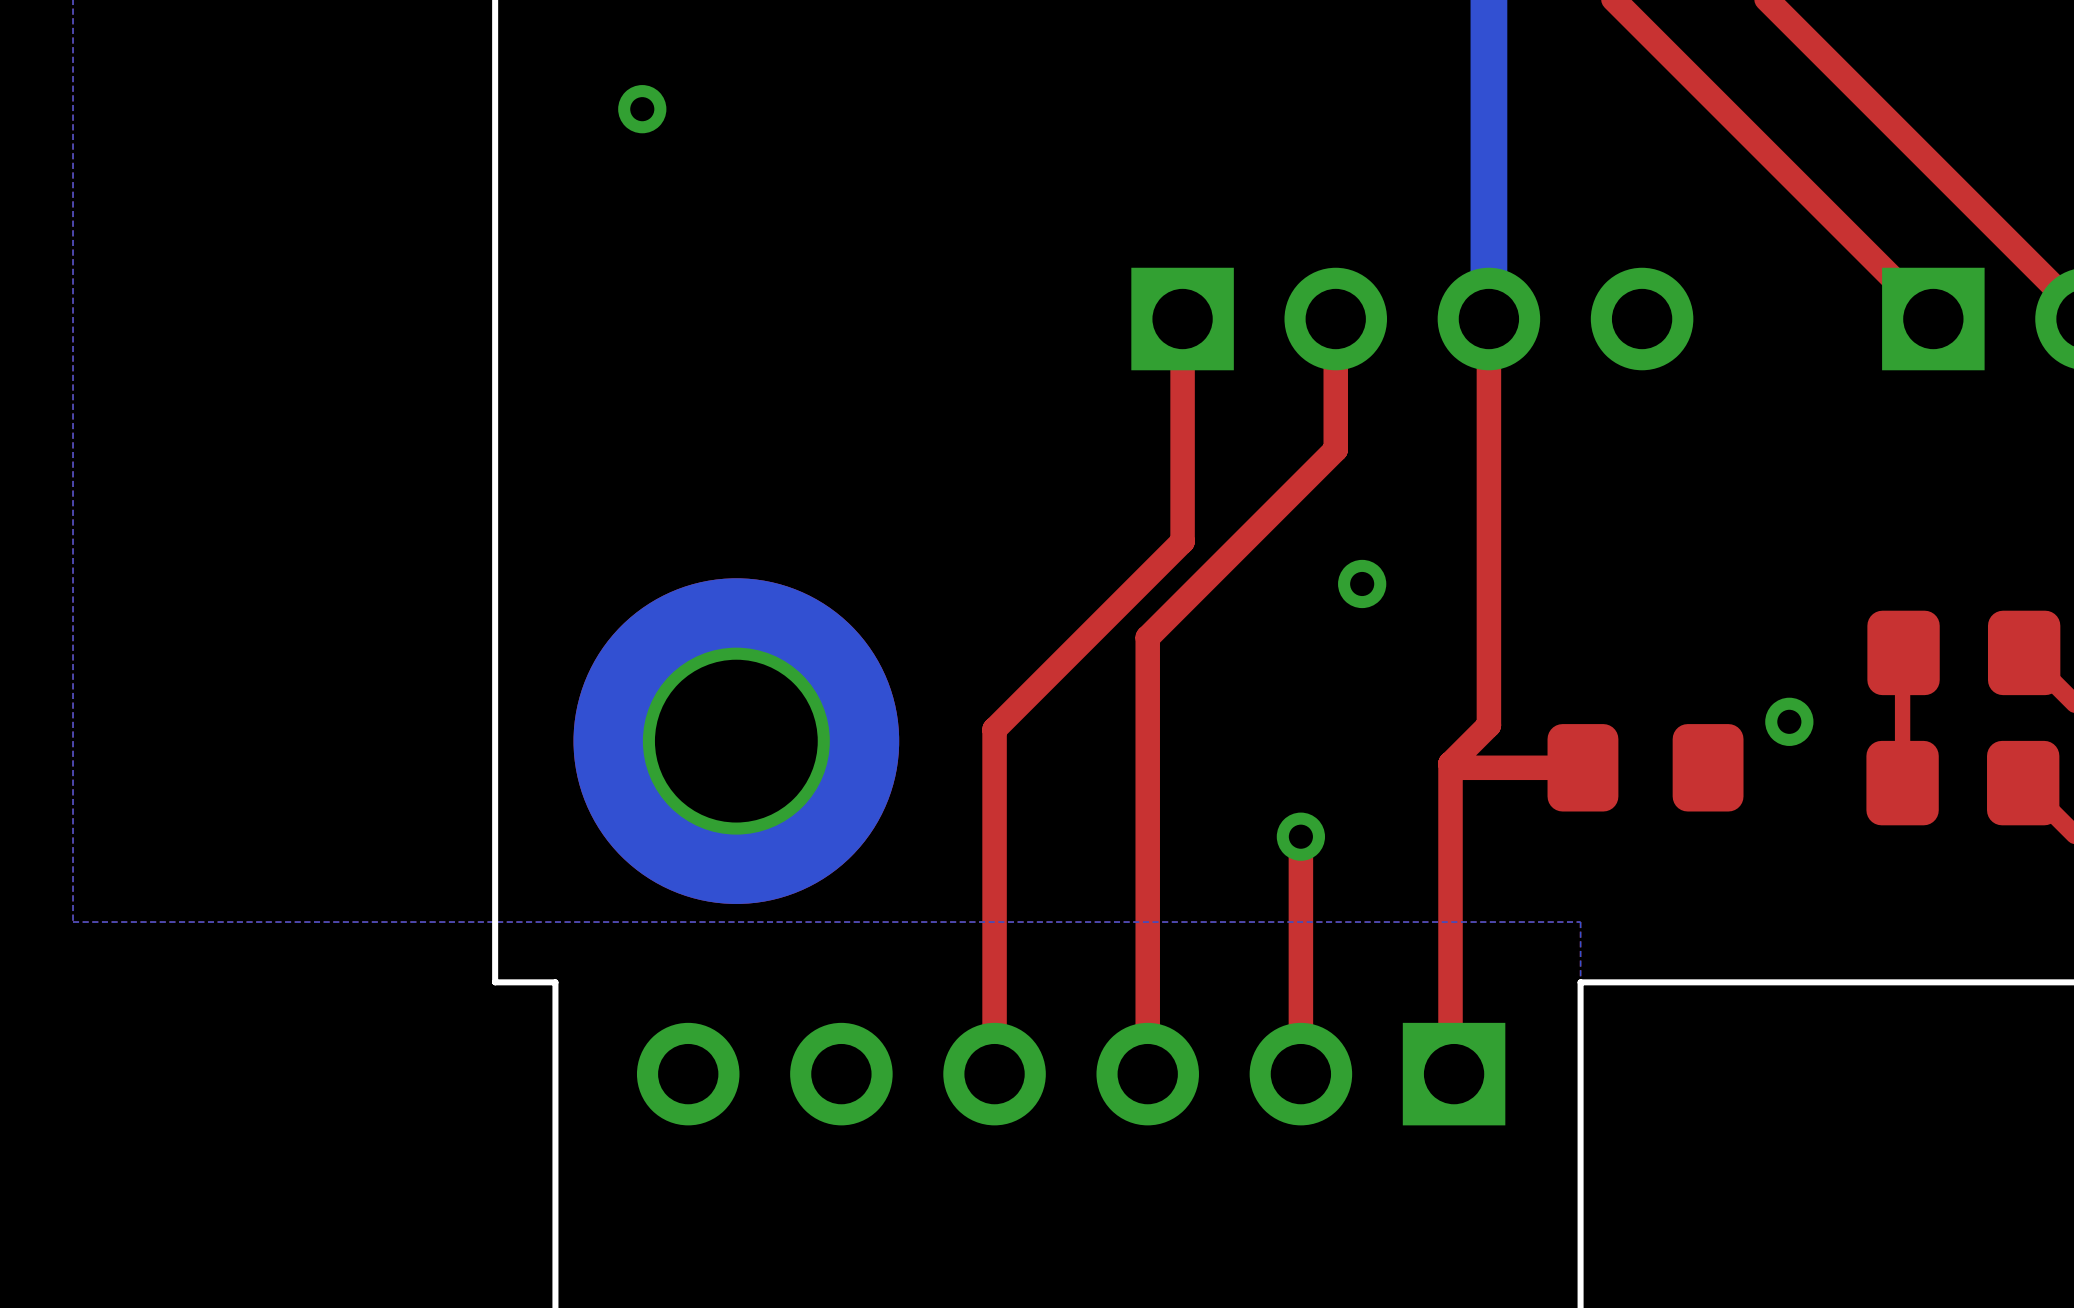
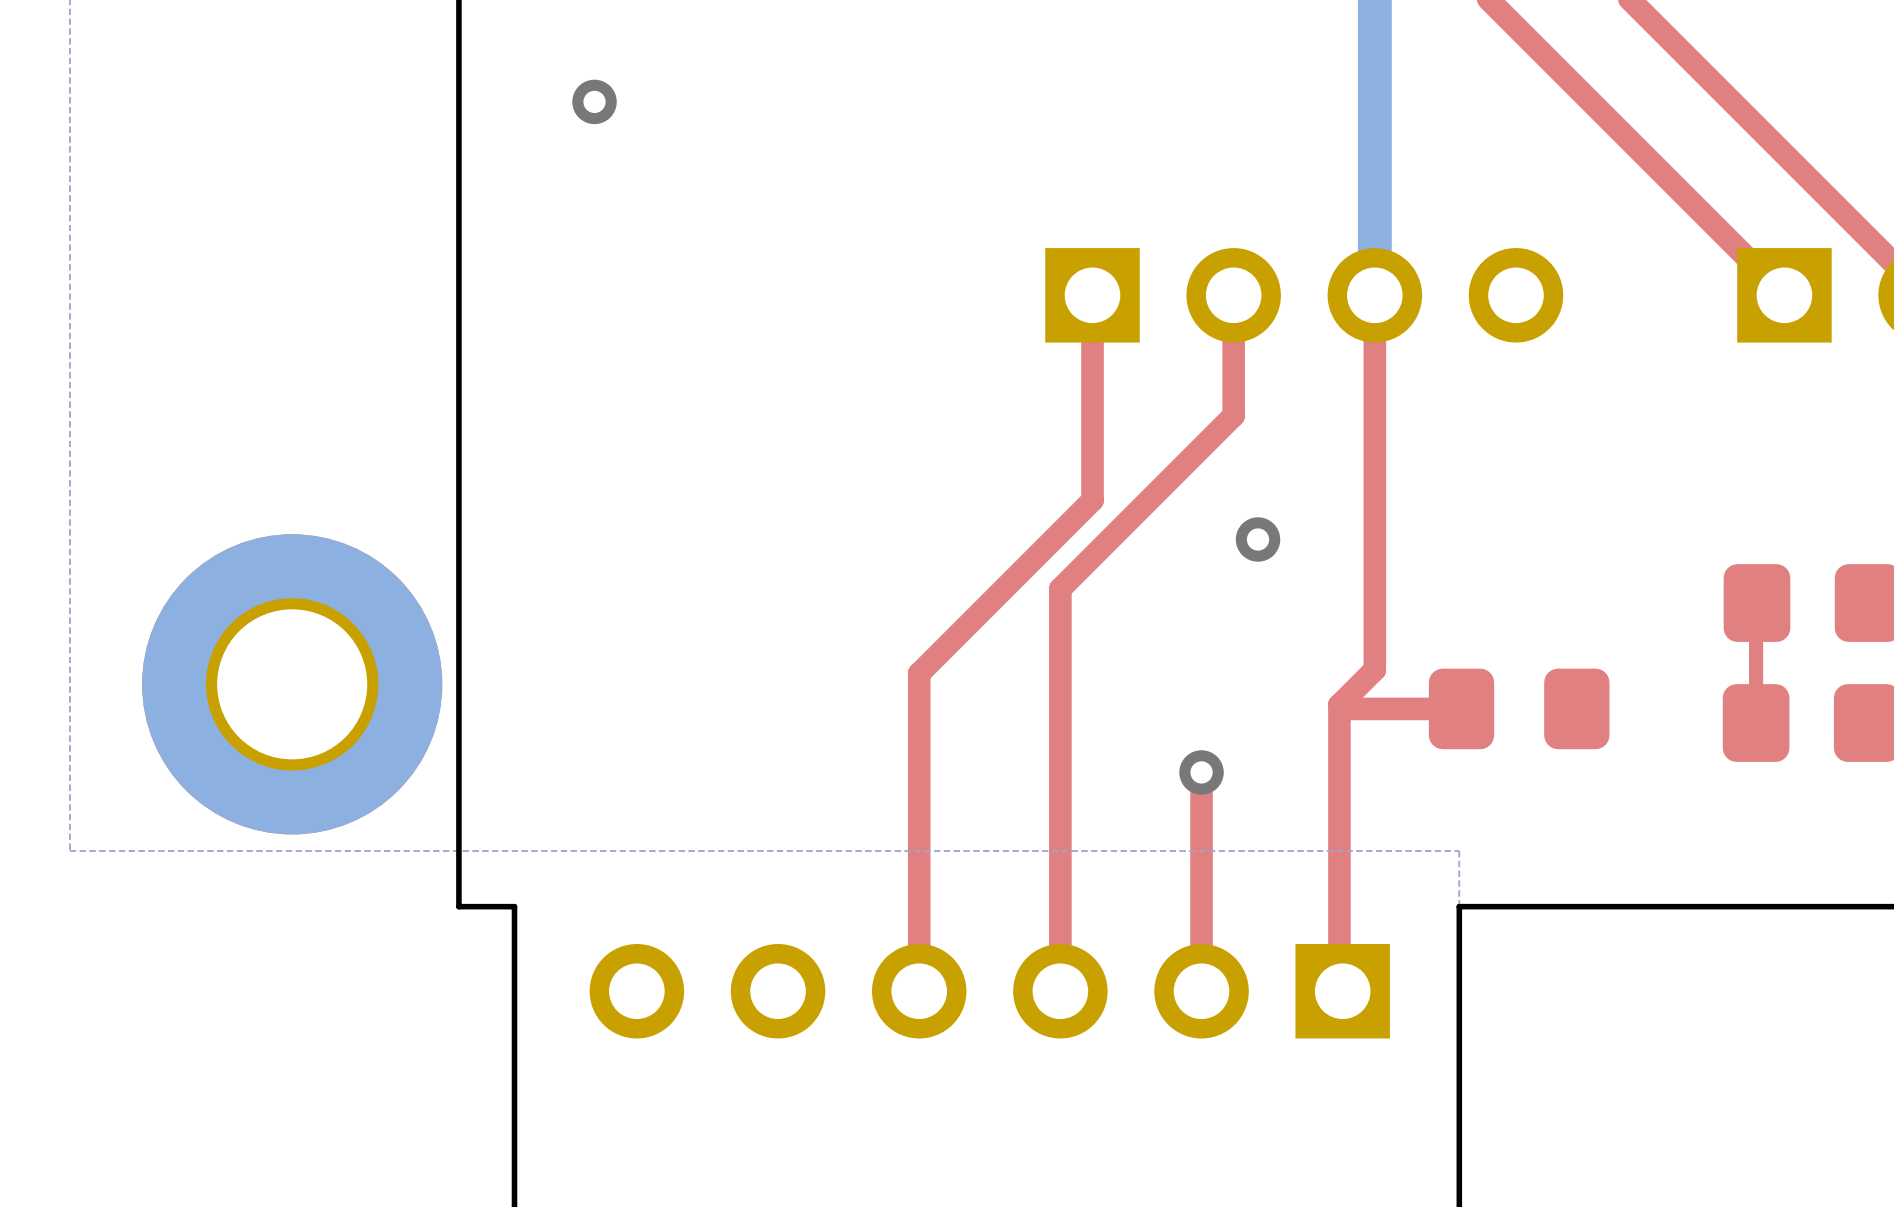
via: (1789, 721) -> none
part position: (736, 741) -> (292, 684)

